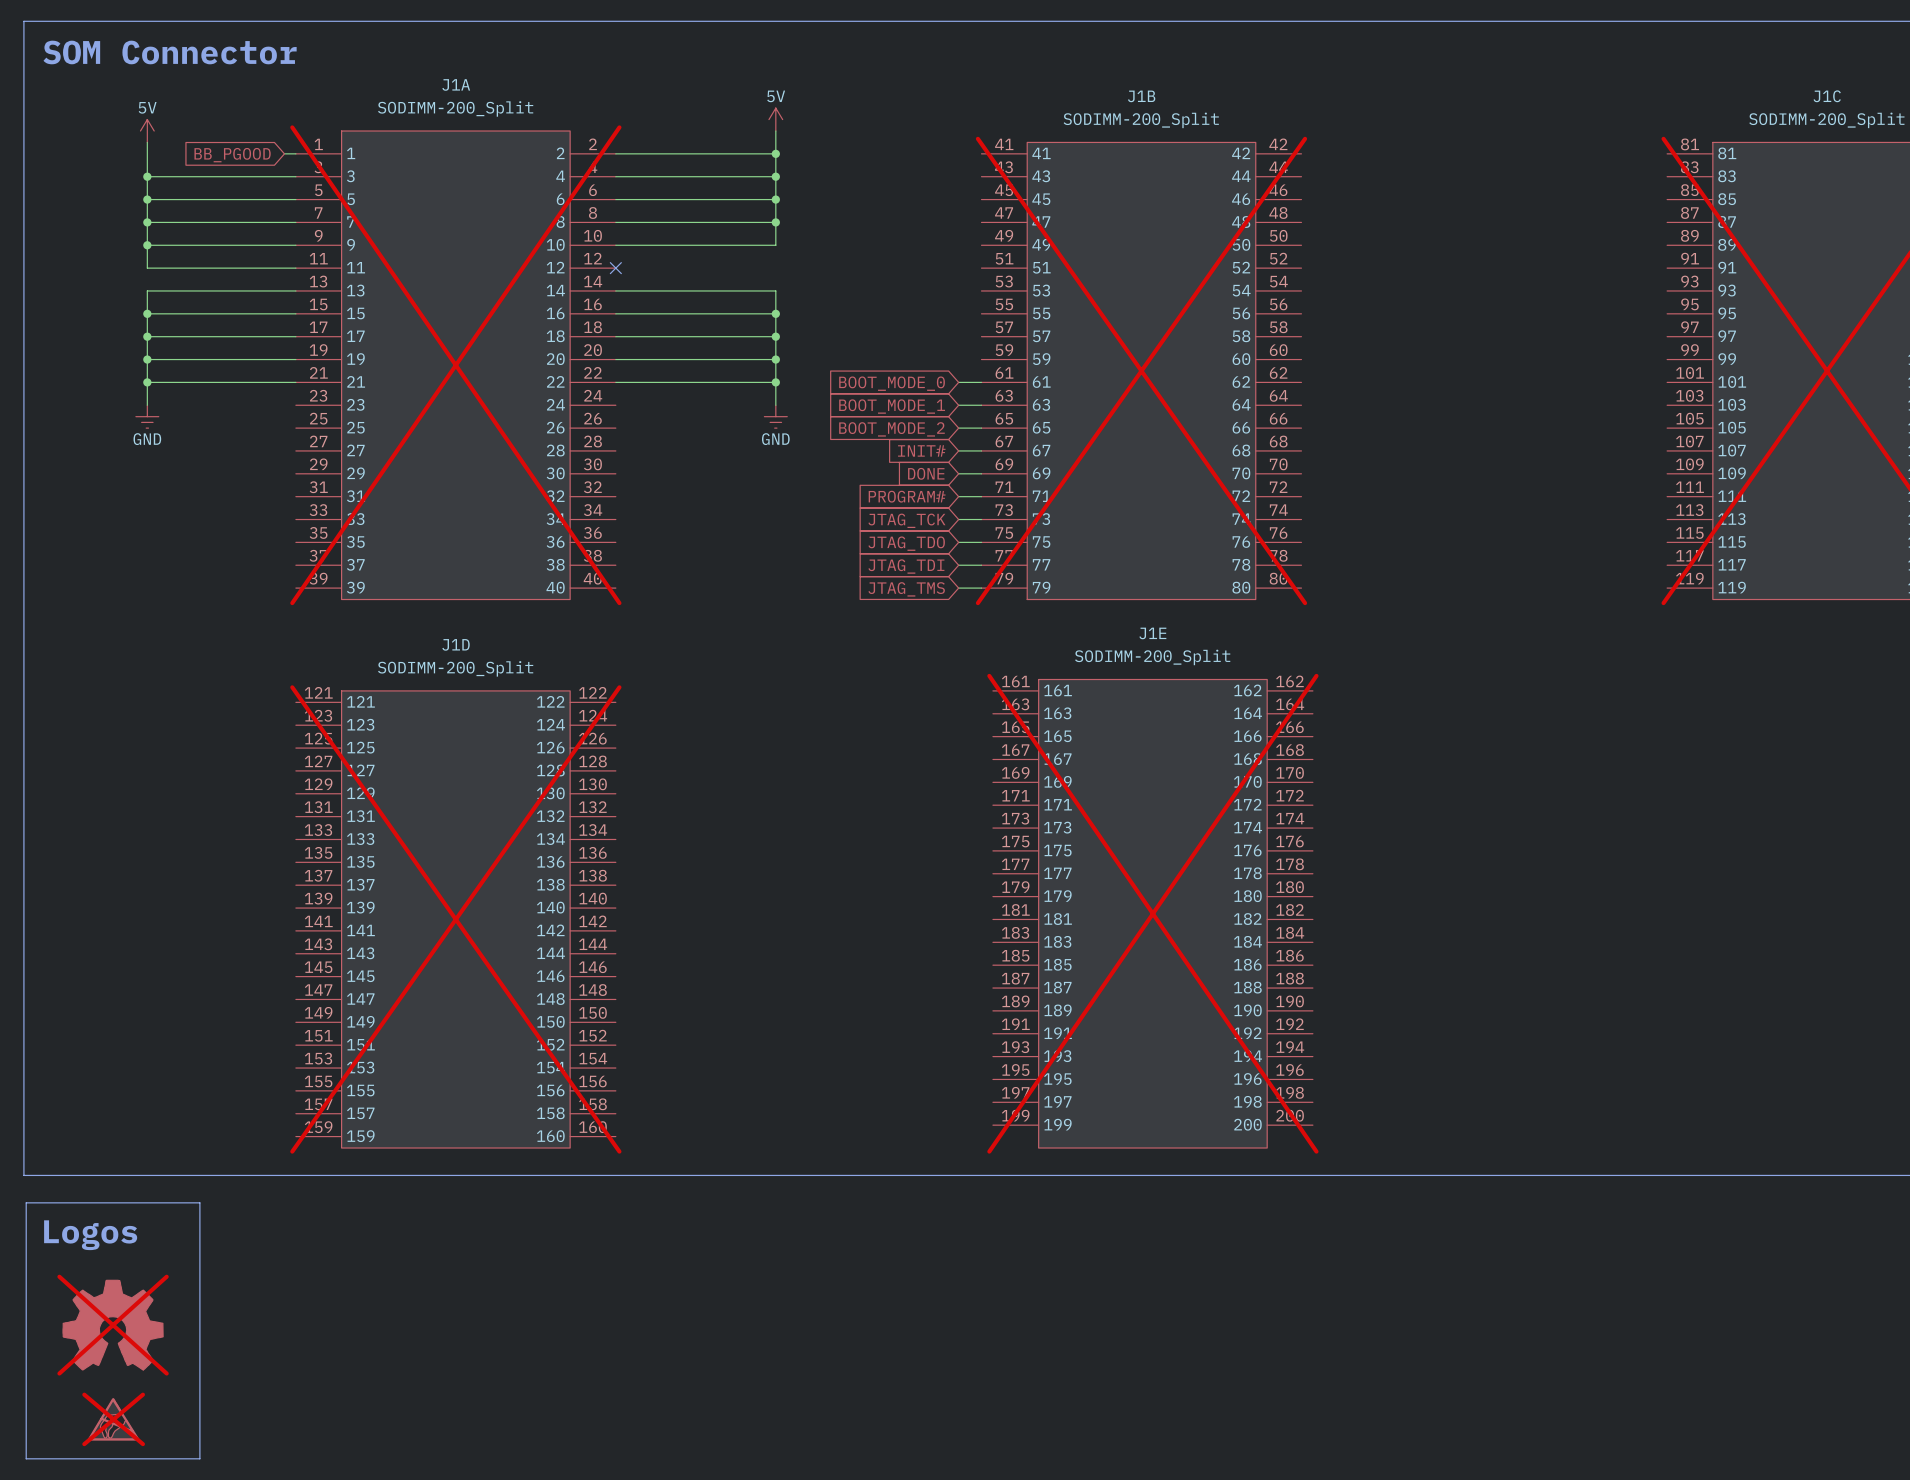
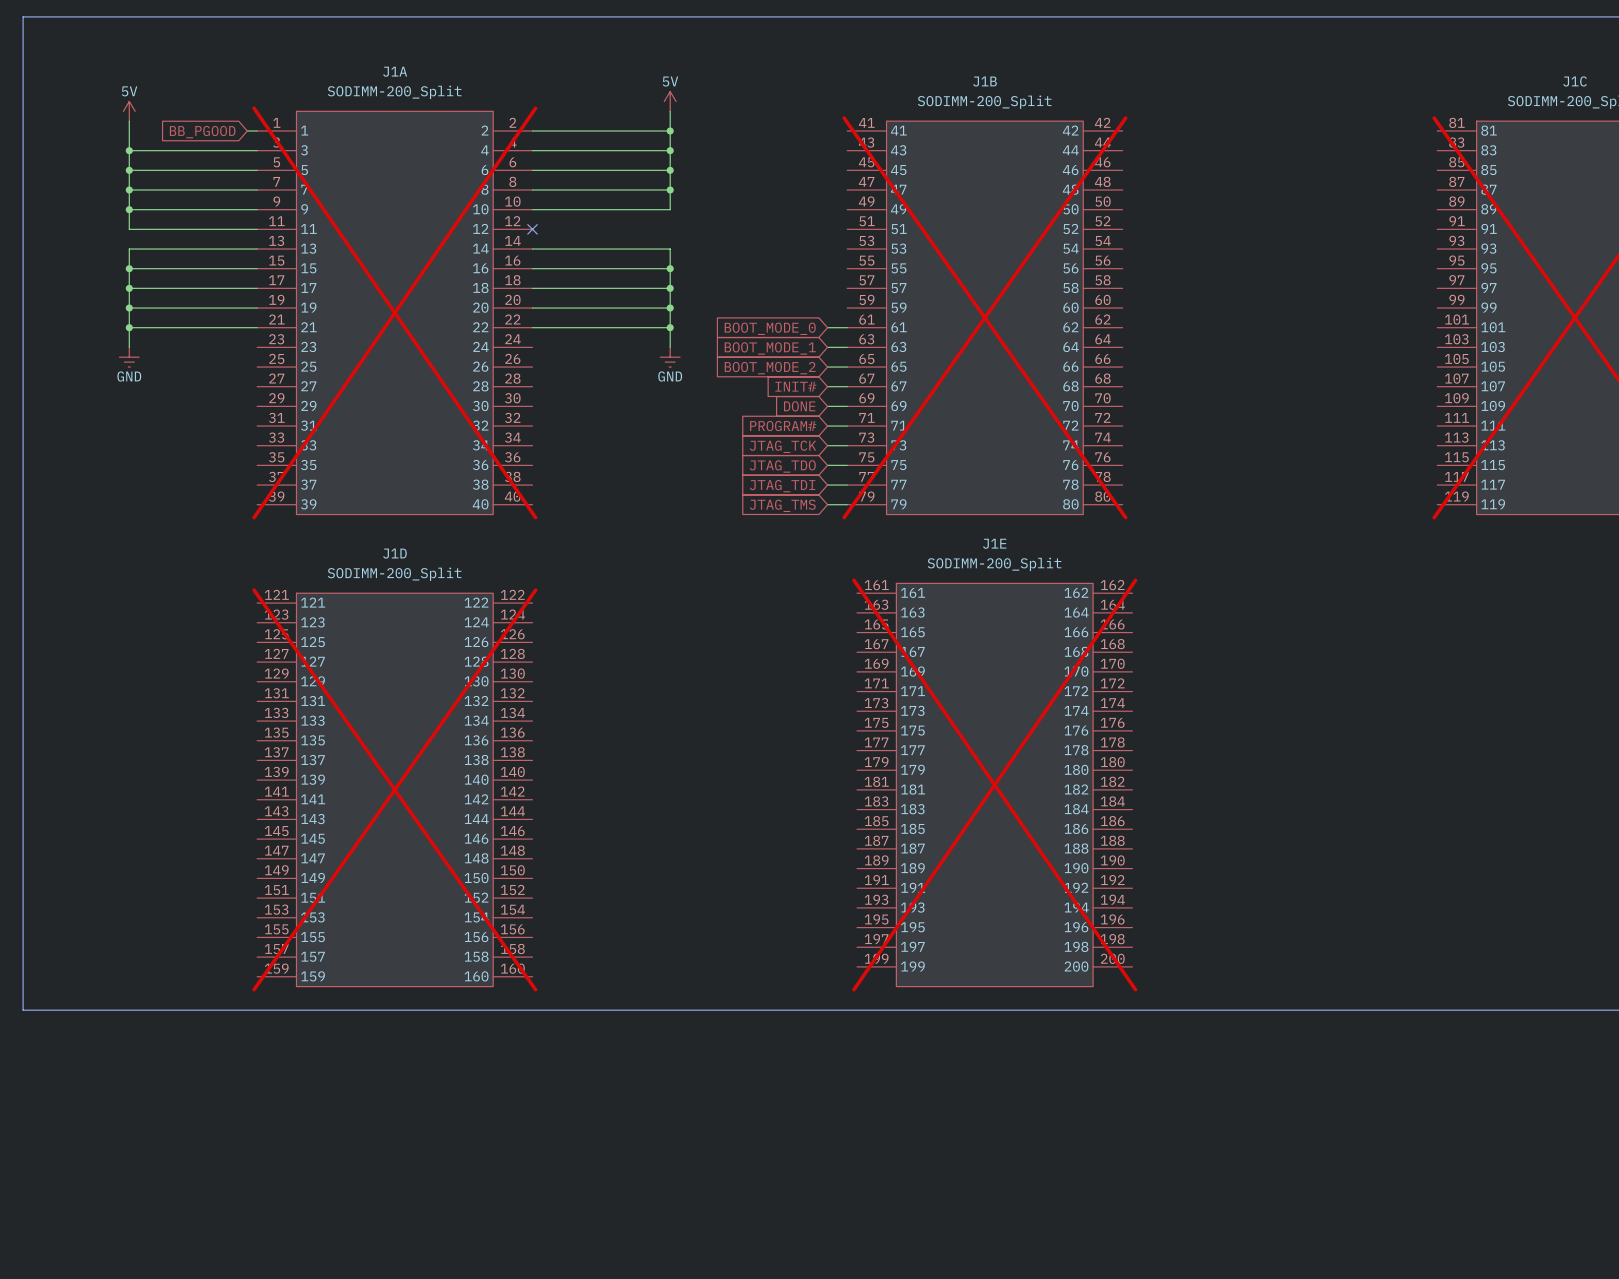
text: SOM Connector (170, 52) -> none
line: (26, 1202) (199, 1202) (199, 1458) (26, 1458) (26, 1202) -> none
text: Logos (90, 1235) -> none
power symbol: (113, 1325) -> none
power symbol: (113, 1419) -> none

